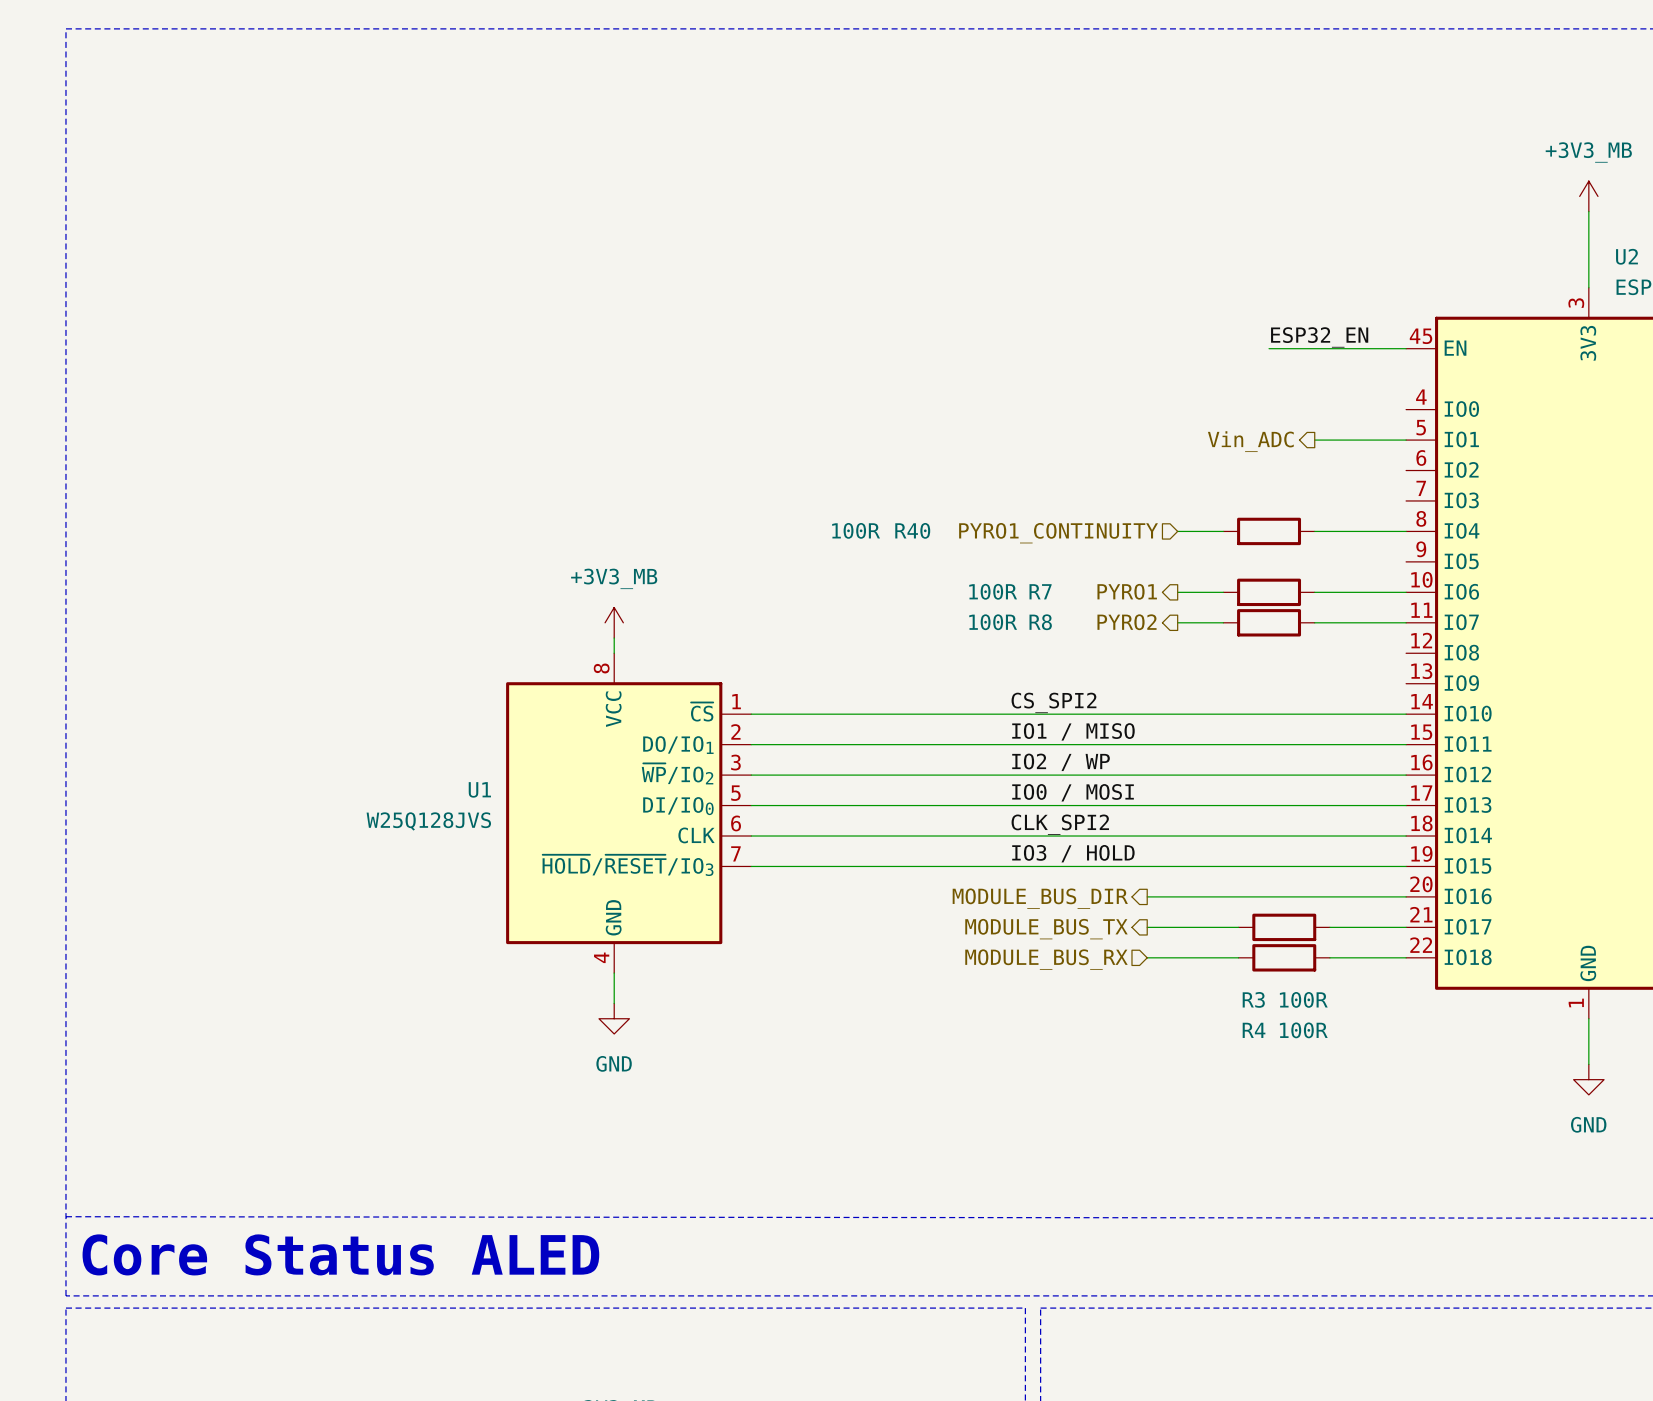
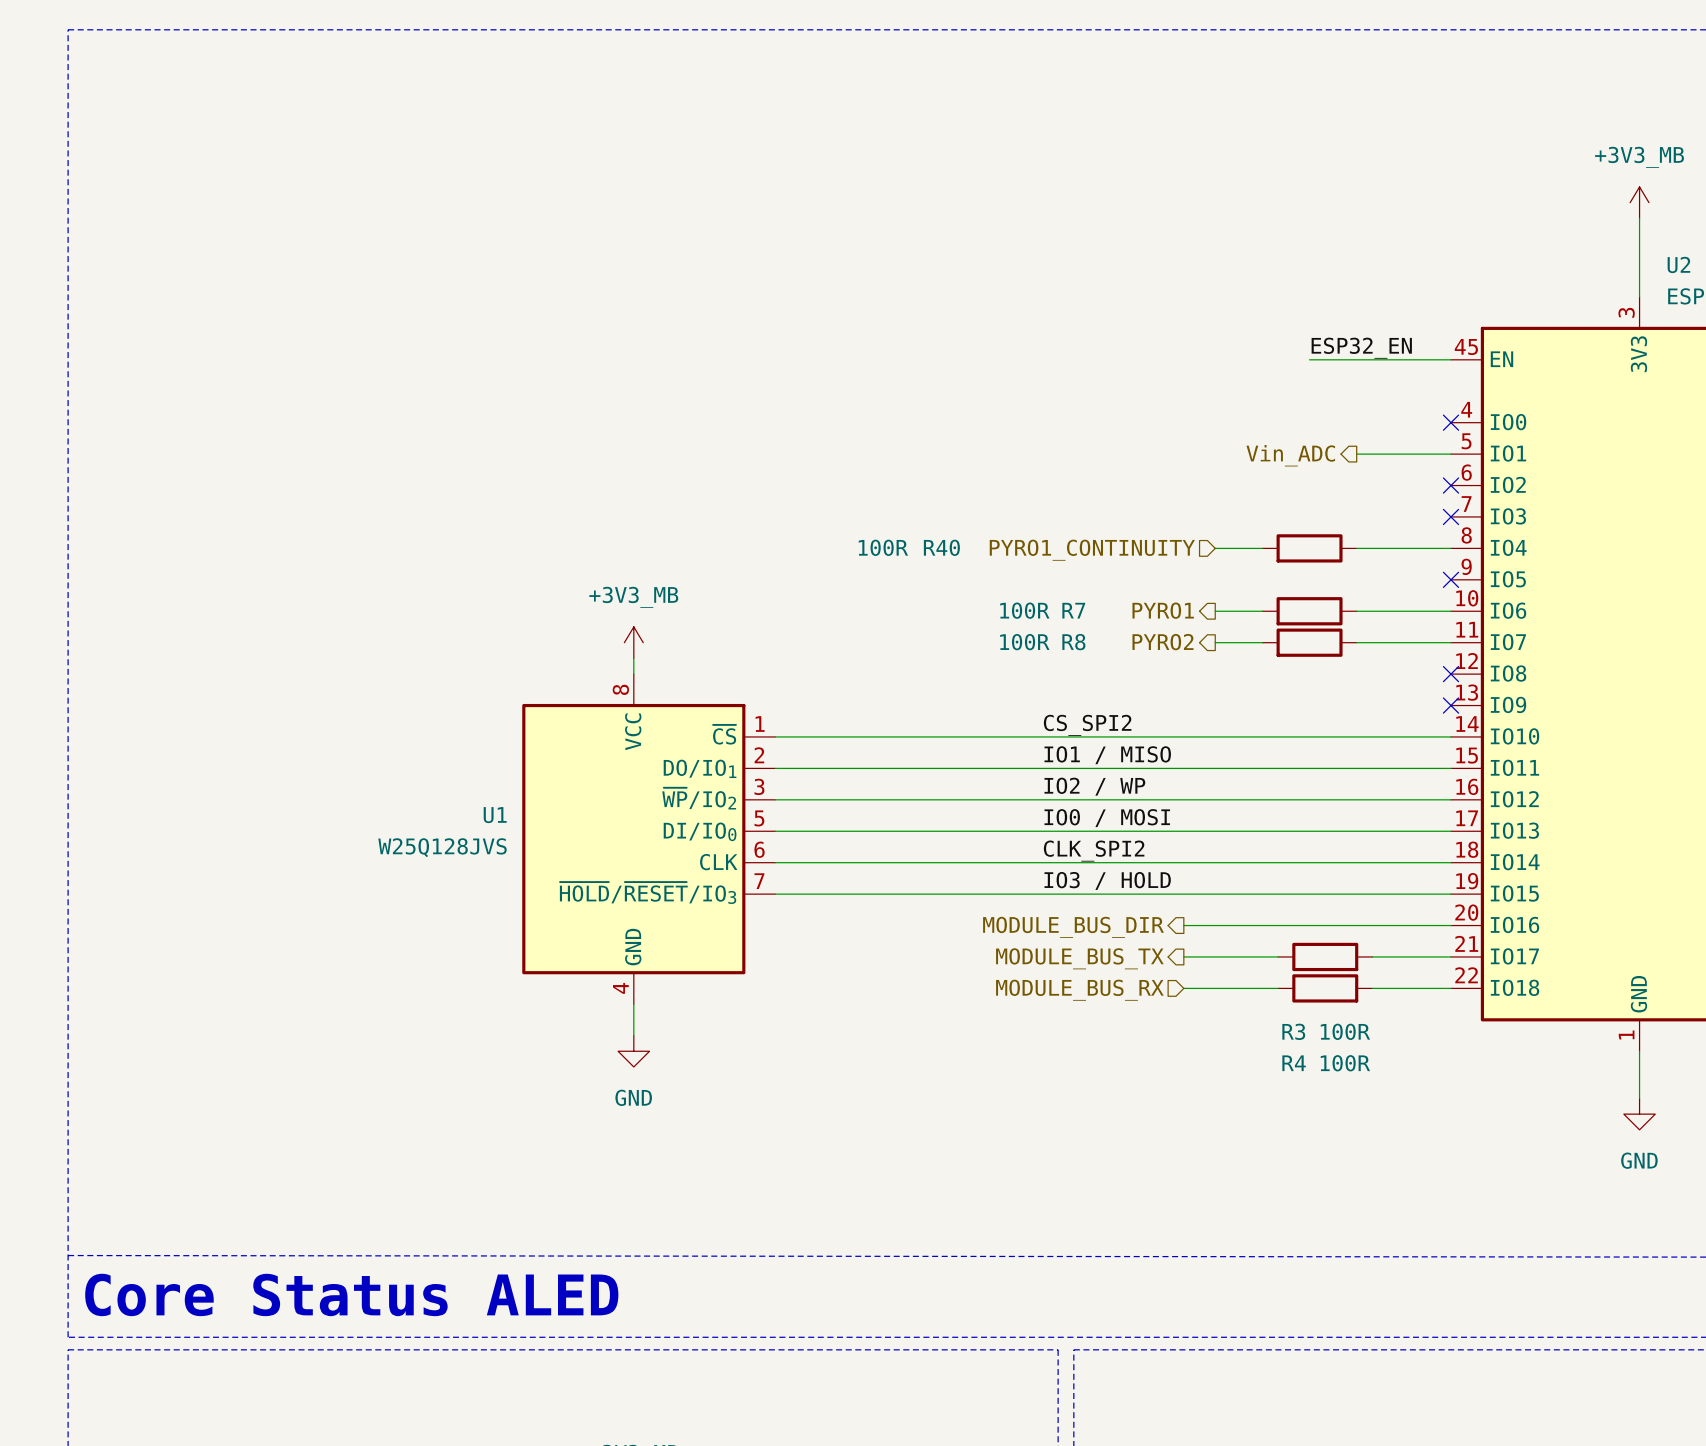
no-connect mark: none -> (1450, 422)
no-connect mark: none -> (1450, 485)
no-connect mark: none -> (1450, 516)
no-connect mark: none -> (1450, 579)
no-connect mark: none -> (1450, 674)
no-connect mark: none -> (1450, 705)

